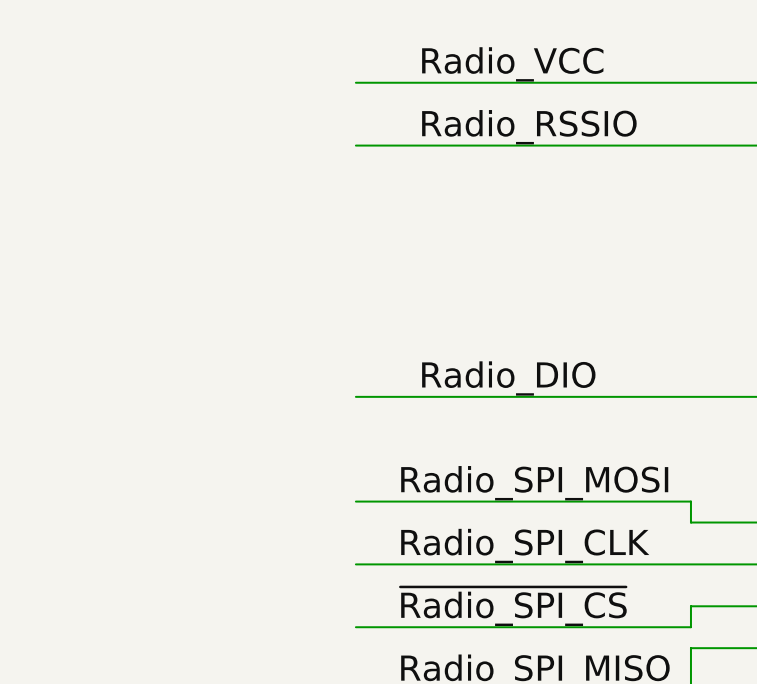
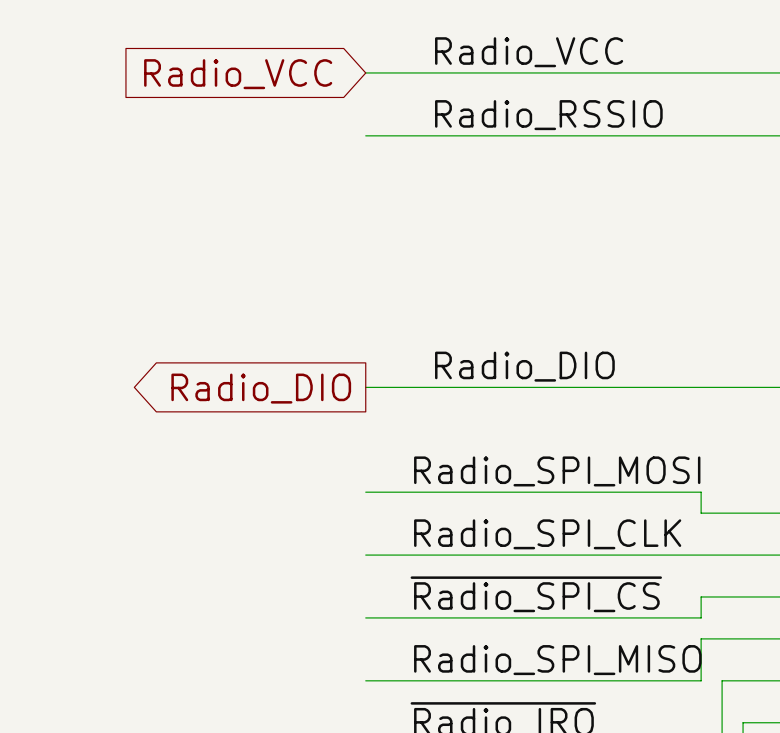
global label: none -> Radio_VCC (238, 74)
global label: none -> Radio_DIO (261, 388)

